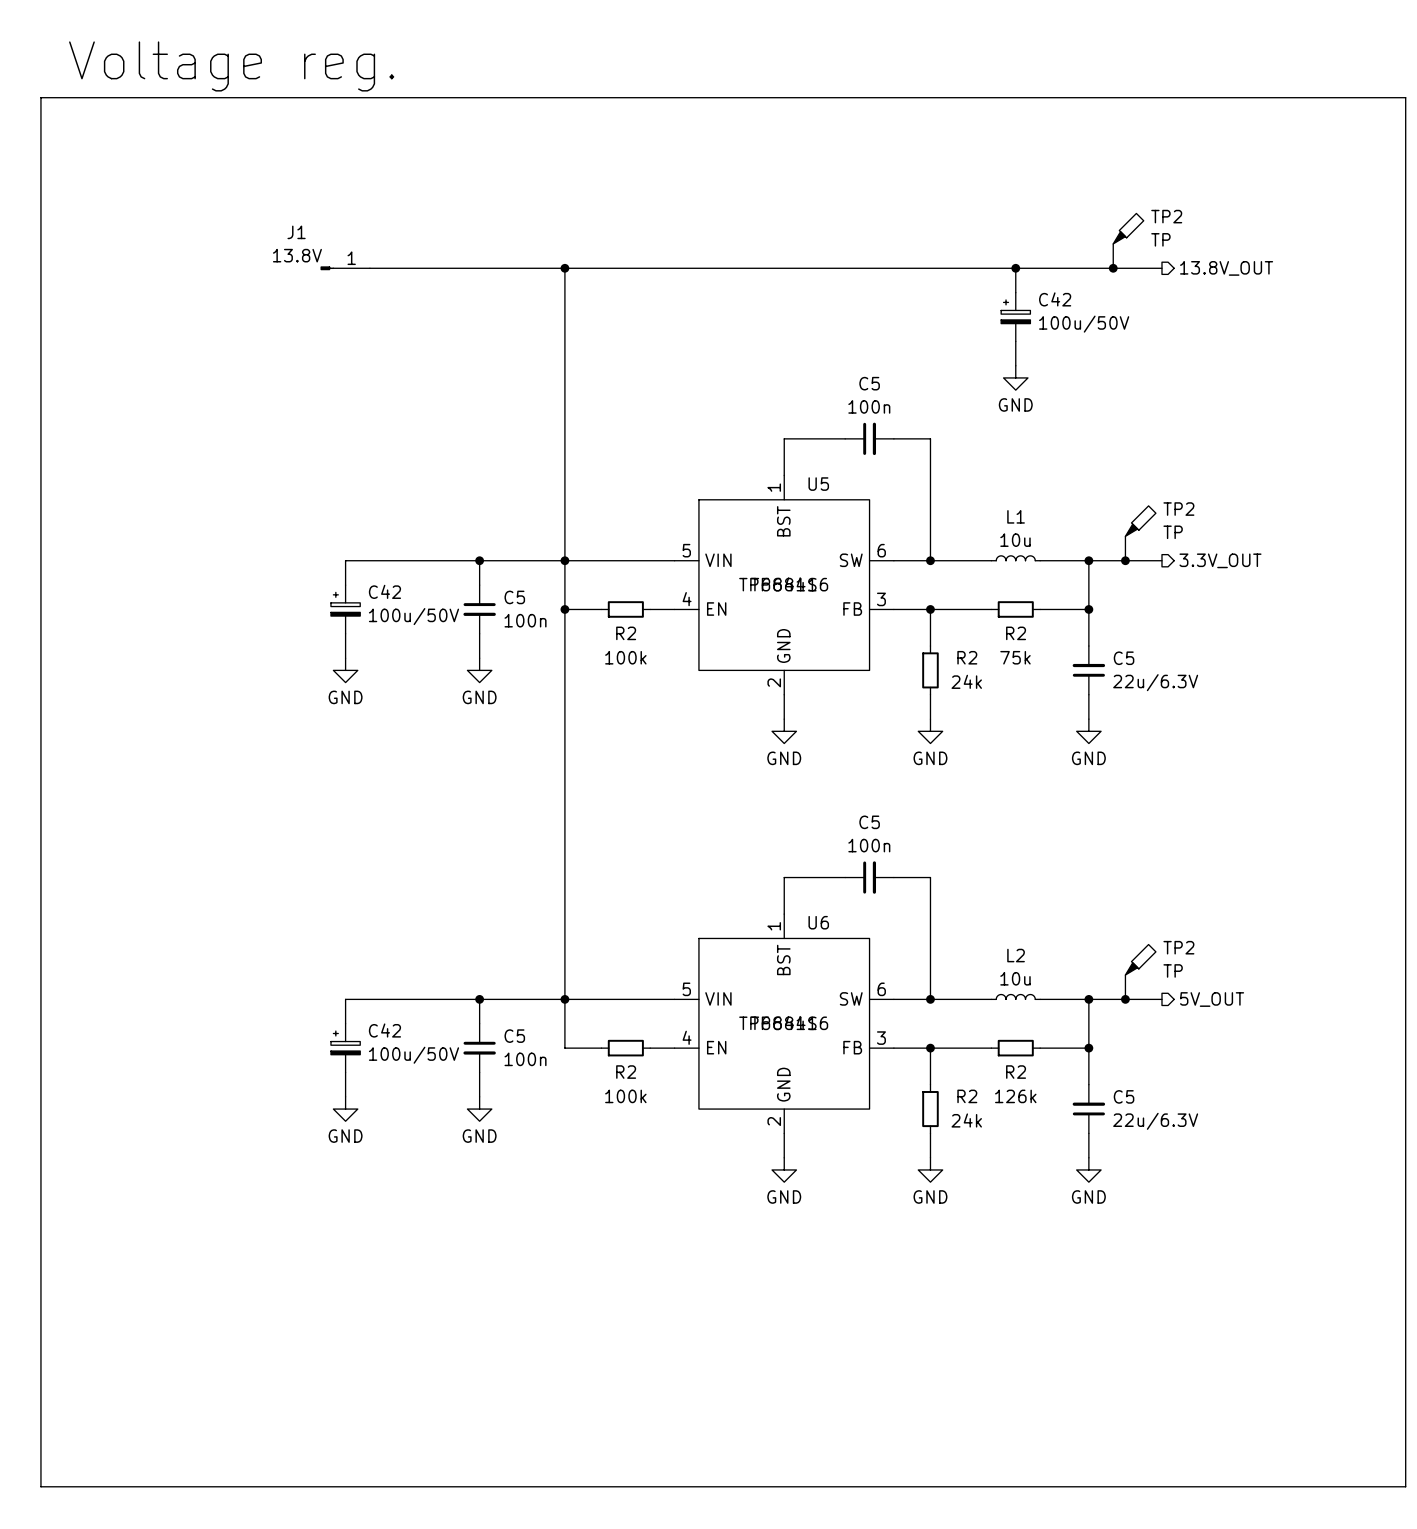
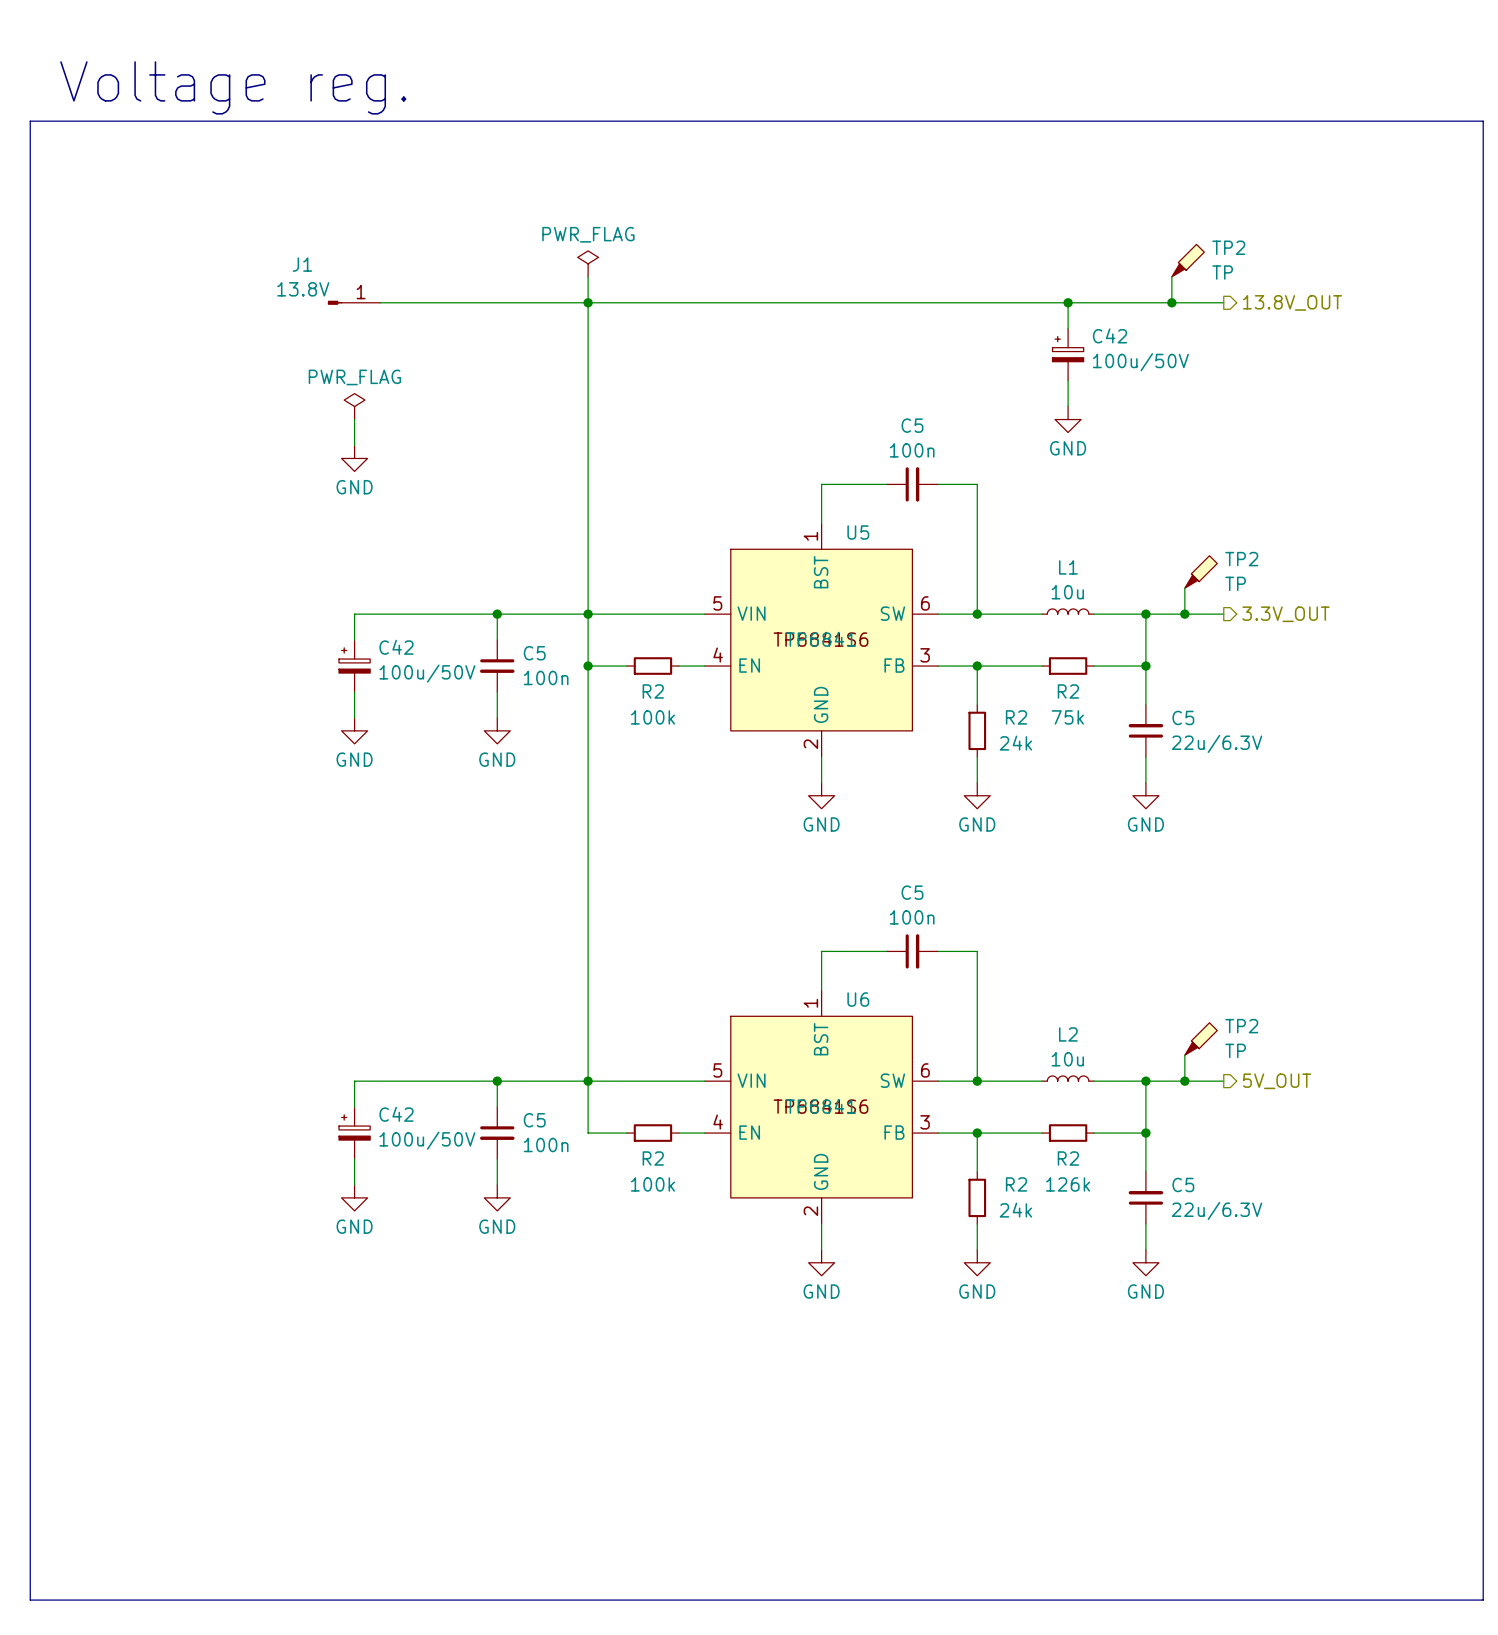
power symbol: none -> PWR_FLAG (588, 263)
wire: none -> (588, 276) (588, 302)
power symbol: none -> PWR_FLAG (354, 406)
wire: none -> (354, 419) (354, 445)
power symbol: none -> GND (354, 458)

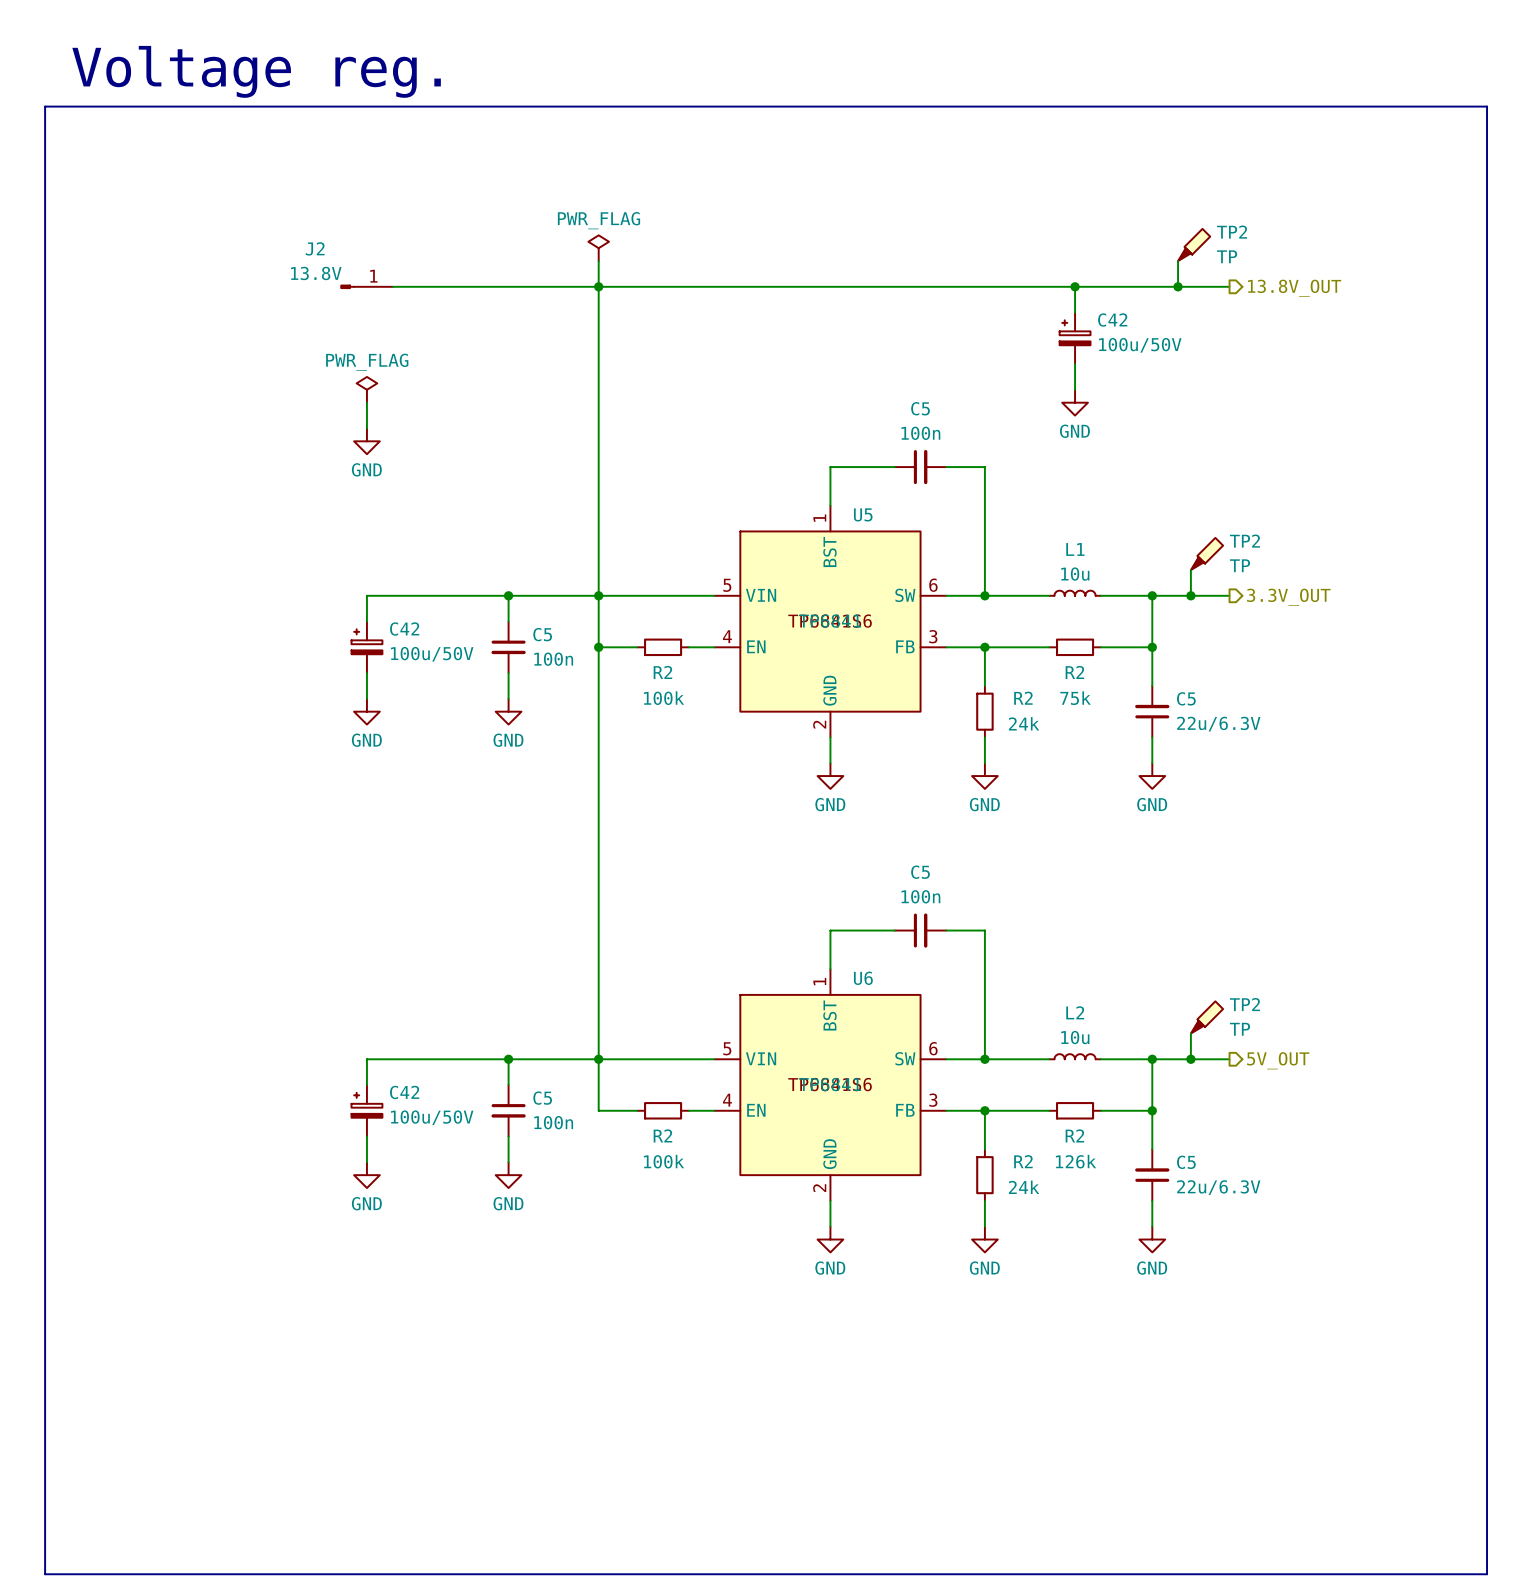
J1 name: J1 (302, 264) -> J2 (315, 248)

